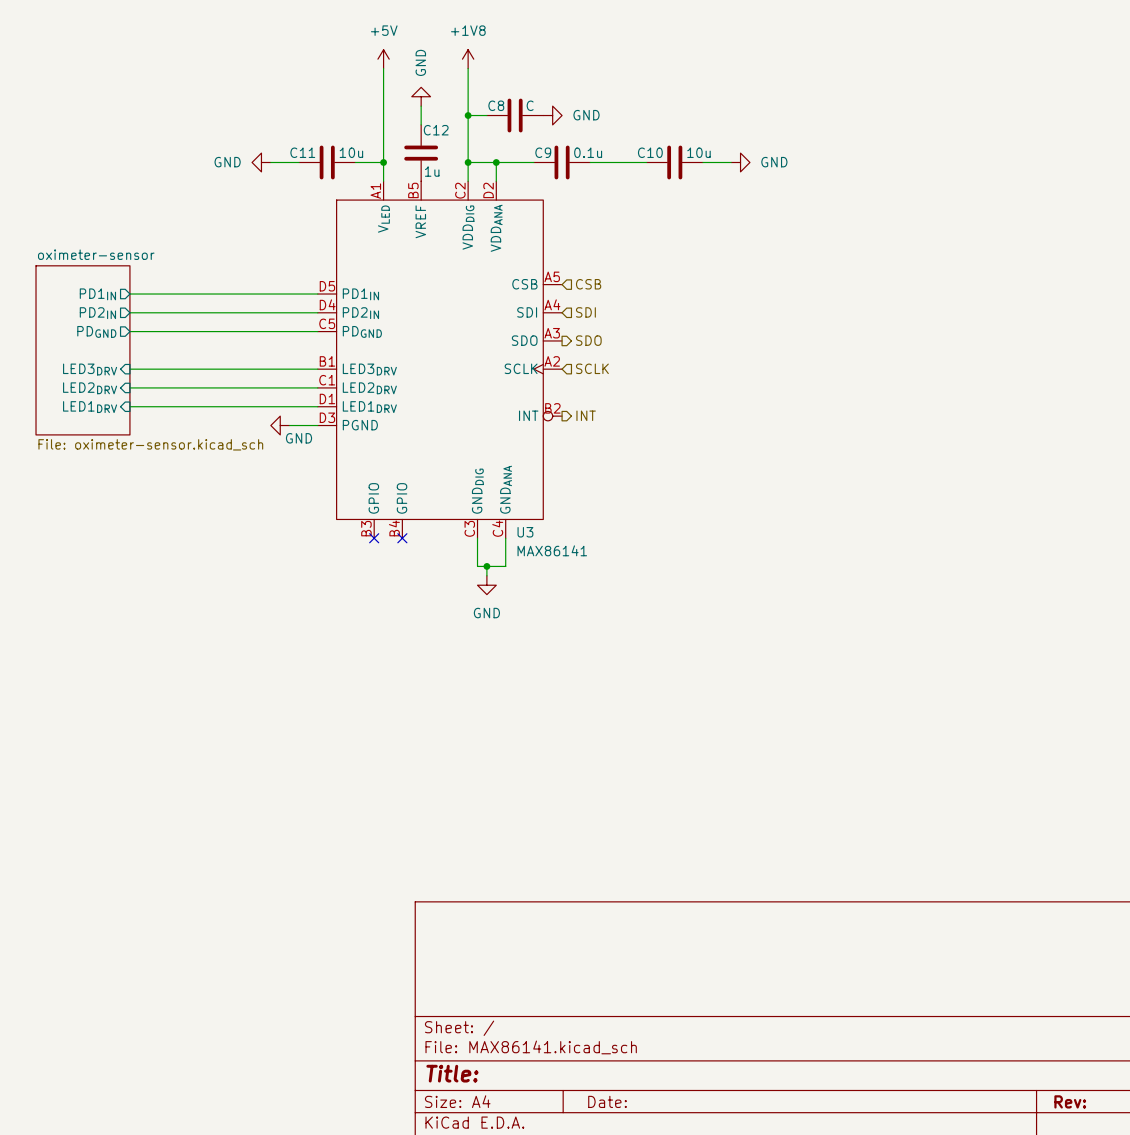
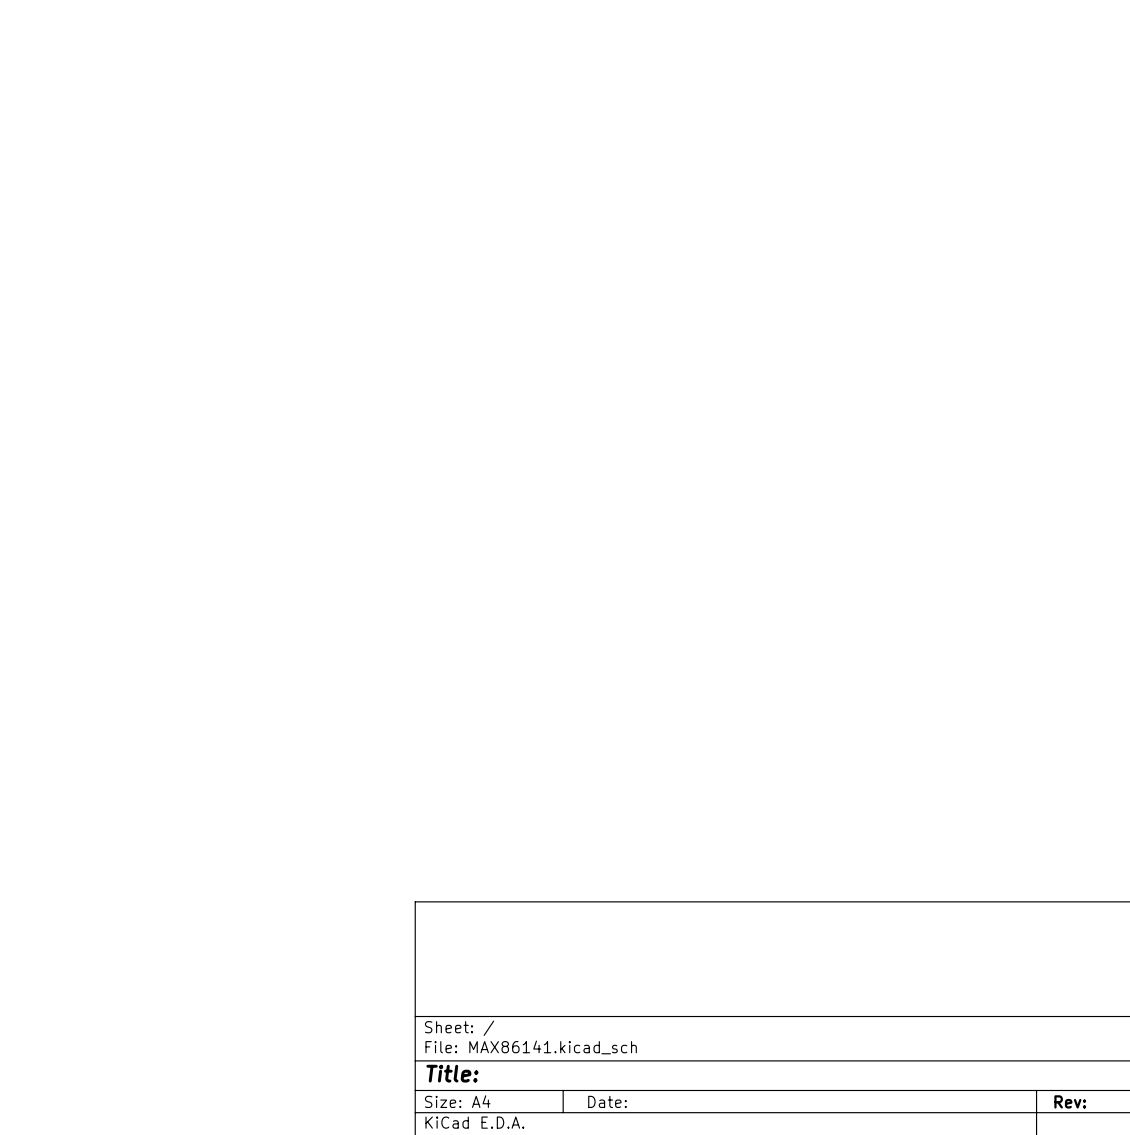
power symbol: +5V (383, 59) -> none
power symbol: +1V8 (468, 59) -> none
wire: (383, 68) (383, 181) -> none
wire: (468, 68) (468, 181) -> none
power symbol: GND (421, 96) -> none
wire: (421, 106) (421, 124) -> none
wire: (468, 115) (486, 115) -> none
junction: (468, 115) -> none
C8: C (515, 115) -> none
power symbol: GND (552, 115) -> none
C12: 1u (421, 153) -> none
power symbol: GND (261, 162) -> none
wire: (270, 162) (299, 162) -> none
C11: 10u (327, 162) -> none
wire: (355, 162) (383, 162) -> none
junction: (383, 162) -> none
wire: (468, 162) (533, 162) -> none
junction: (468, 162) -> none
wire: (496, 162) (496, 181) -> none
junction: (496, 162) -> none
C9: 0.1u (562, 162) -> none
wire: (590, 162) (646, 162) -> none
C10: 10u (674, 162) -> none
wire: (702, 162) (731, 162) -> none
power symbol: GND (740, 162) -> none
hierarchical label: CSB (588, 284) -> none
sheet pin: PD1IN (97, 294) -> none
wire: (129, 294) (317, 294) -> none
wire: (129, 312) (317, 312) -> none
hierarchical label: SDI (585, 312) -> none
sheet pin: PD2IN (97, 313) -> none
sheet pin: PDGND (96, 331) -> none
wire: (129, 331) (317, 331) -> none
hierarchical label: SDO (588, 340) -> none
sheet oximeter-sensor: File: oximeter-sensor.kicad_sch (82, 350) -> none
U3: MAX86141 (439, 359) -> none
hierarchical label: SCLK (592, 368) -> none
sheet pin: LED3DRV (90, 369) -> none
wire: (129, 369) (317, 369) -> none
wire: (129, 387) (317, 387) -> none
sheet pin: LED2DRV (90, 388) -> none
wire: (129, 406) (317, 406) -> none
sheet pin: LED1DRV (90, 407) -> none
hierarchical label: INT (586, 415) -> none
power symbol: GND (280, 425) -> none
wire: (289, 425) (317, 425) -> none
no-connect mark: (374, 538) -> none
no-connect mark: (402, 538) -> none
wire: (477, 538) (477, 566) (505, 566) (505, 538) -> none
wire: (486, 566) (486, 575) -> none
junction: (486, 566) -> none
power symbol: GND (486, 585) -> none

